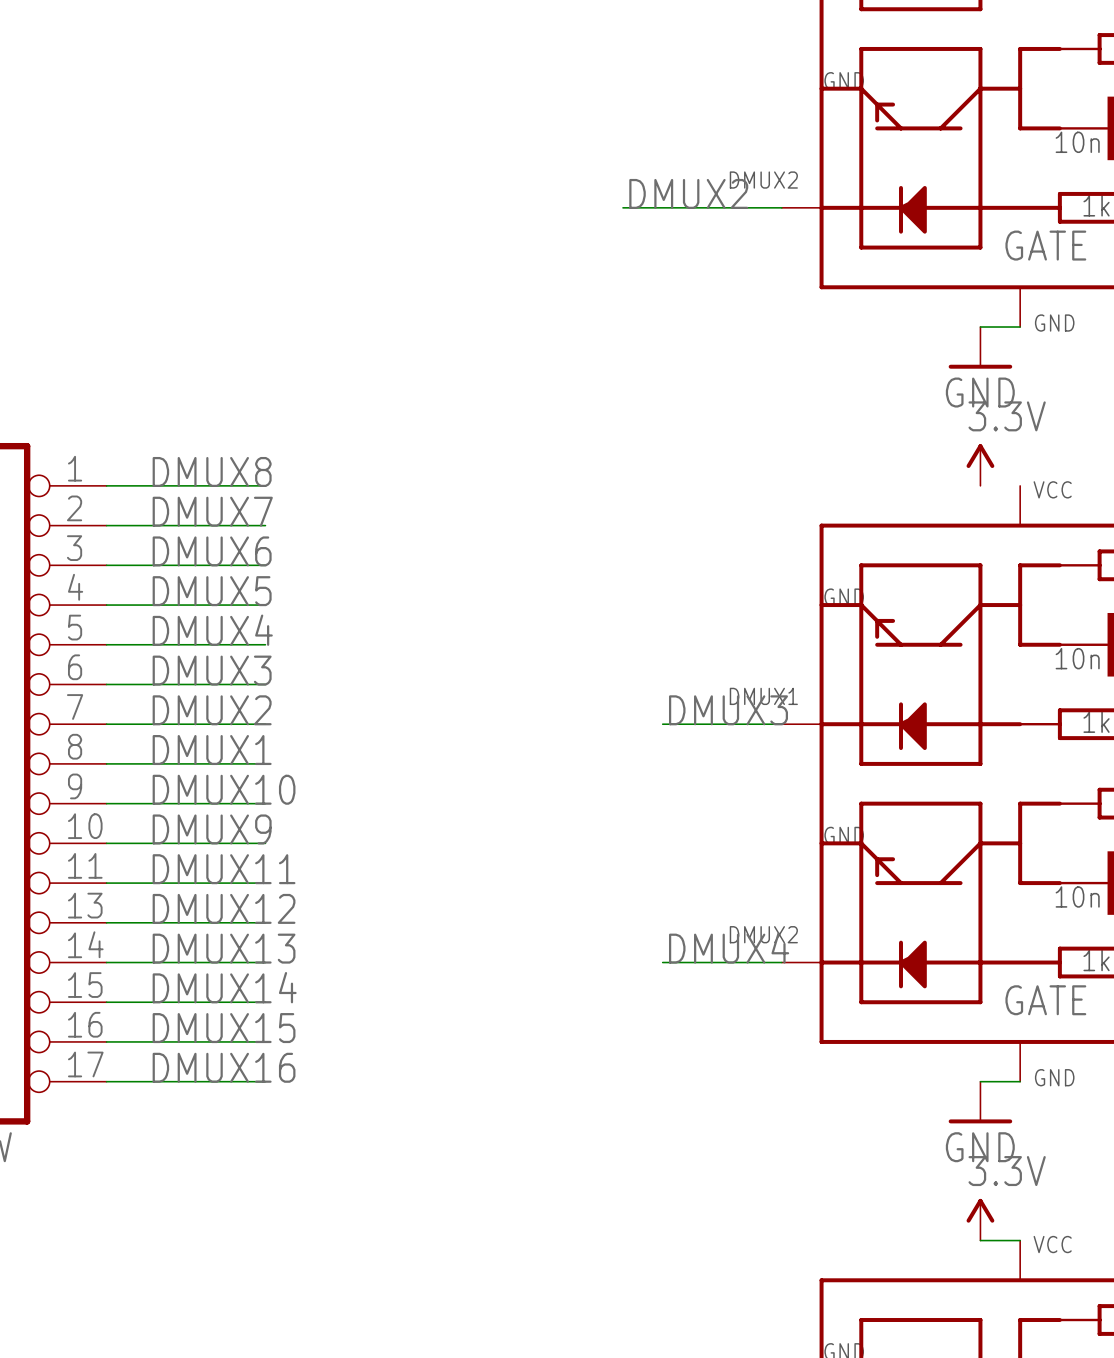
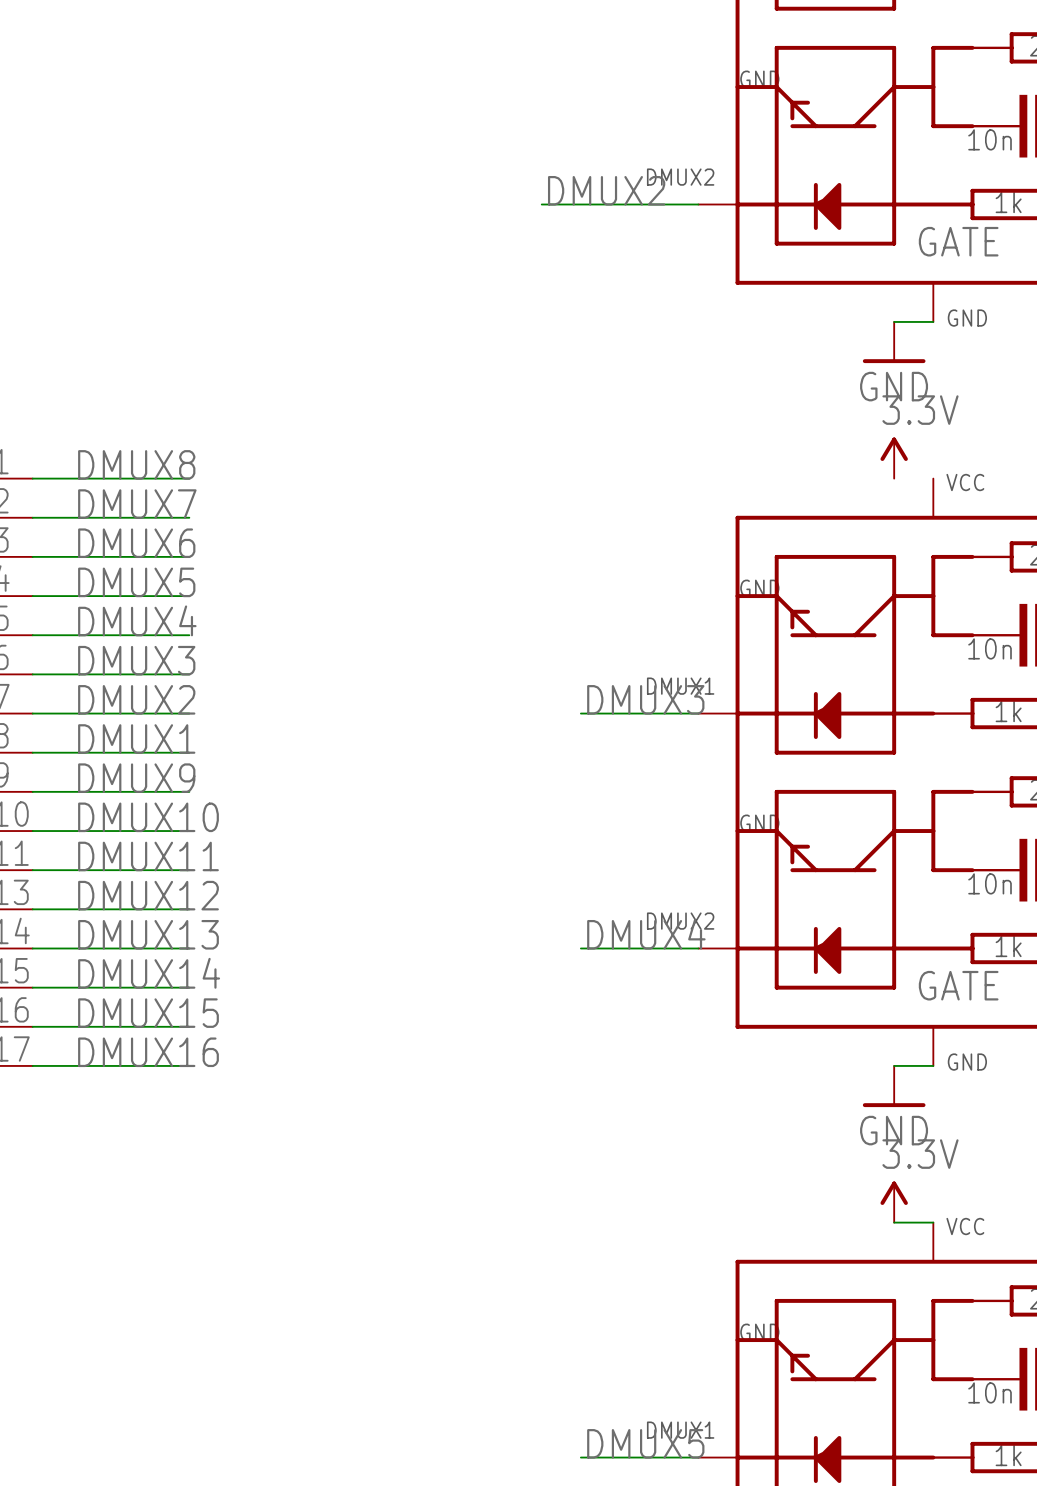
label: DMUX10 (224, 789) -> DMUX9 (136, 778)
label: DMUX9 (212, 829) -> DMUX10 (148, 817)

